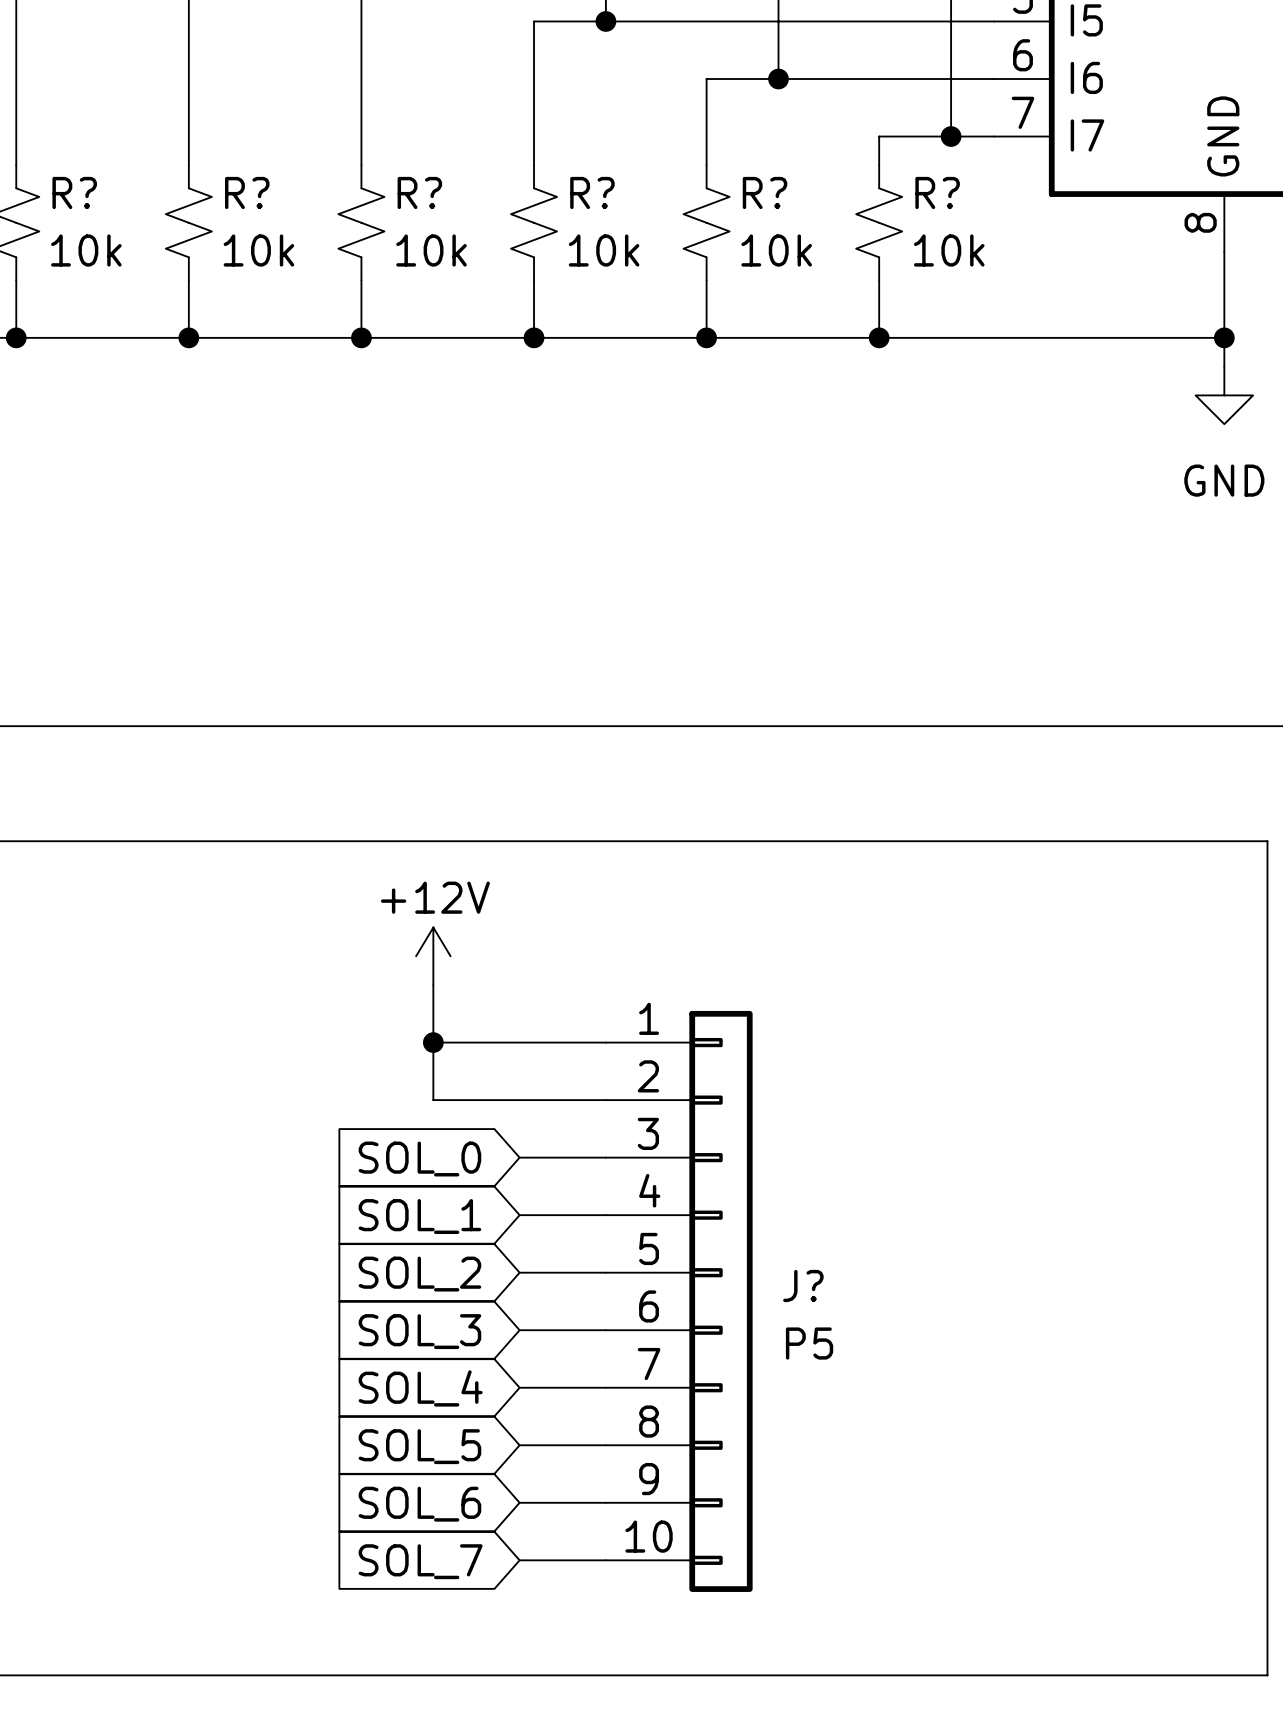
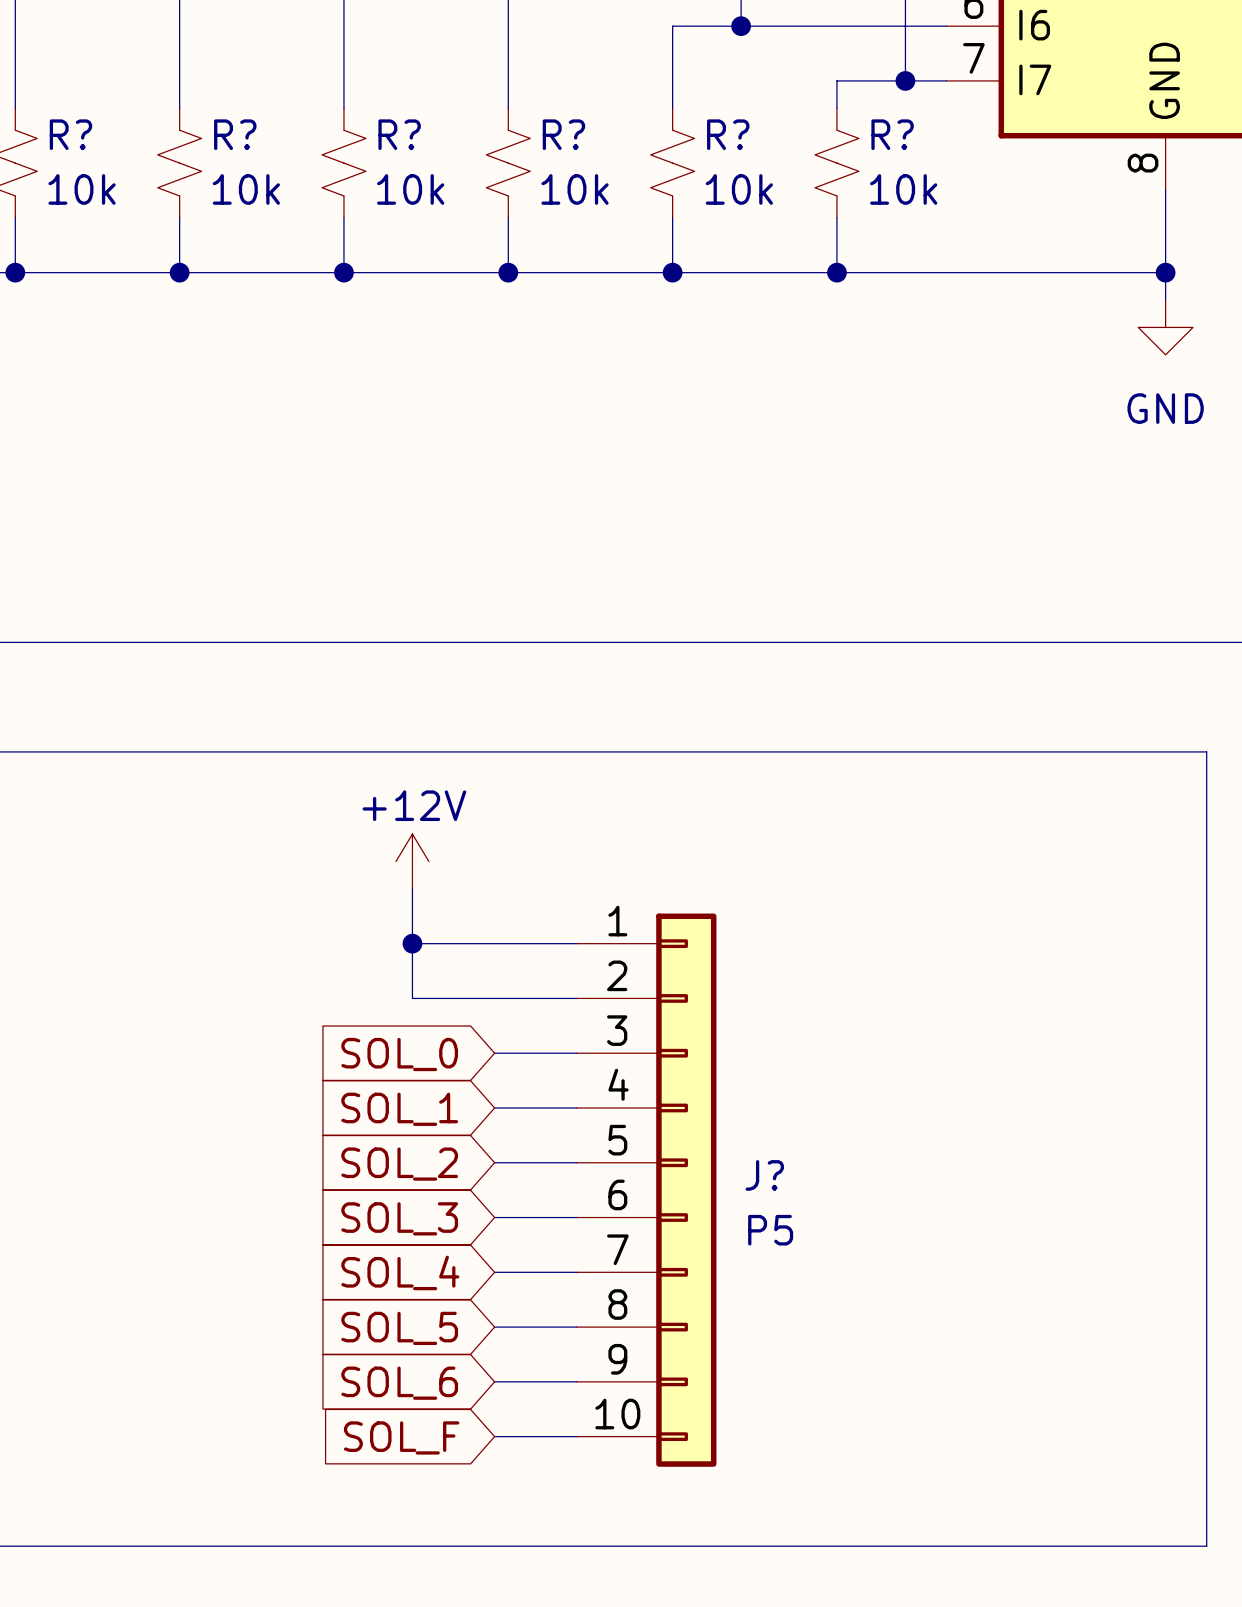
global label: SOL_7 (420, 1561) -> SOL_F (401, 1437)

